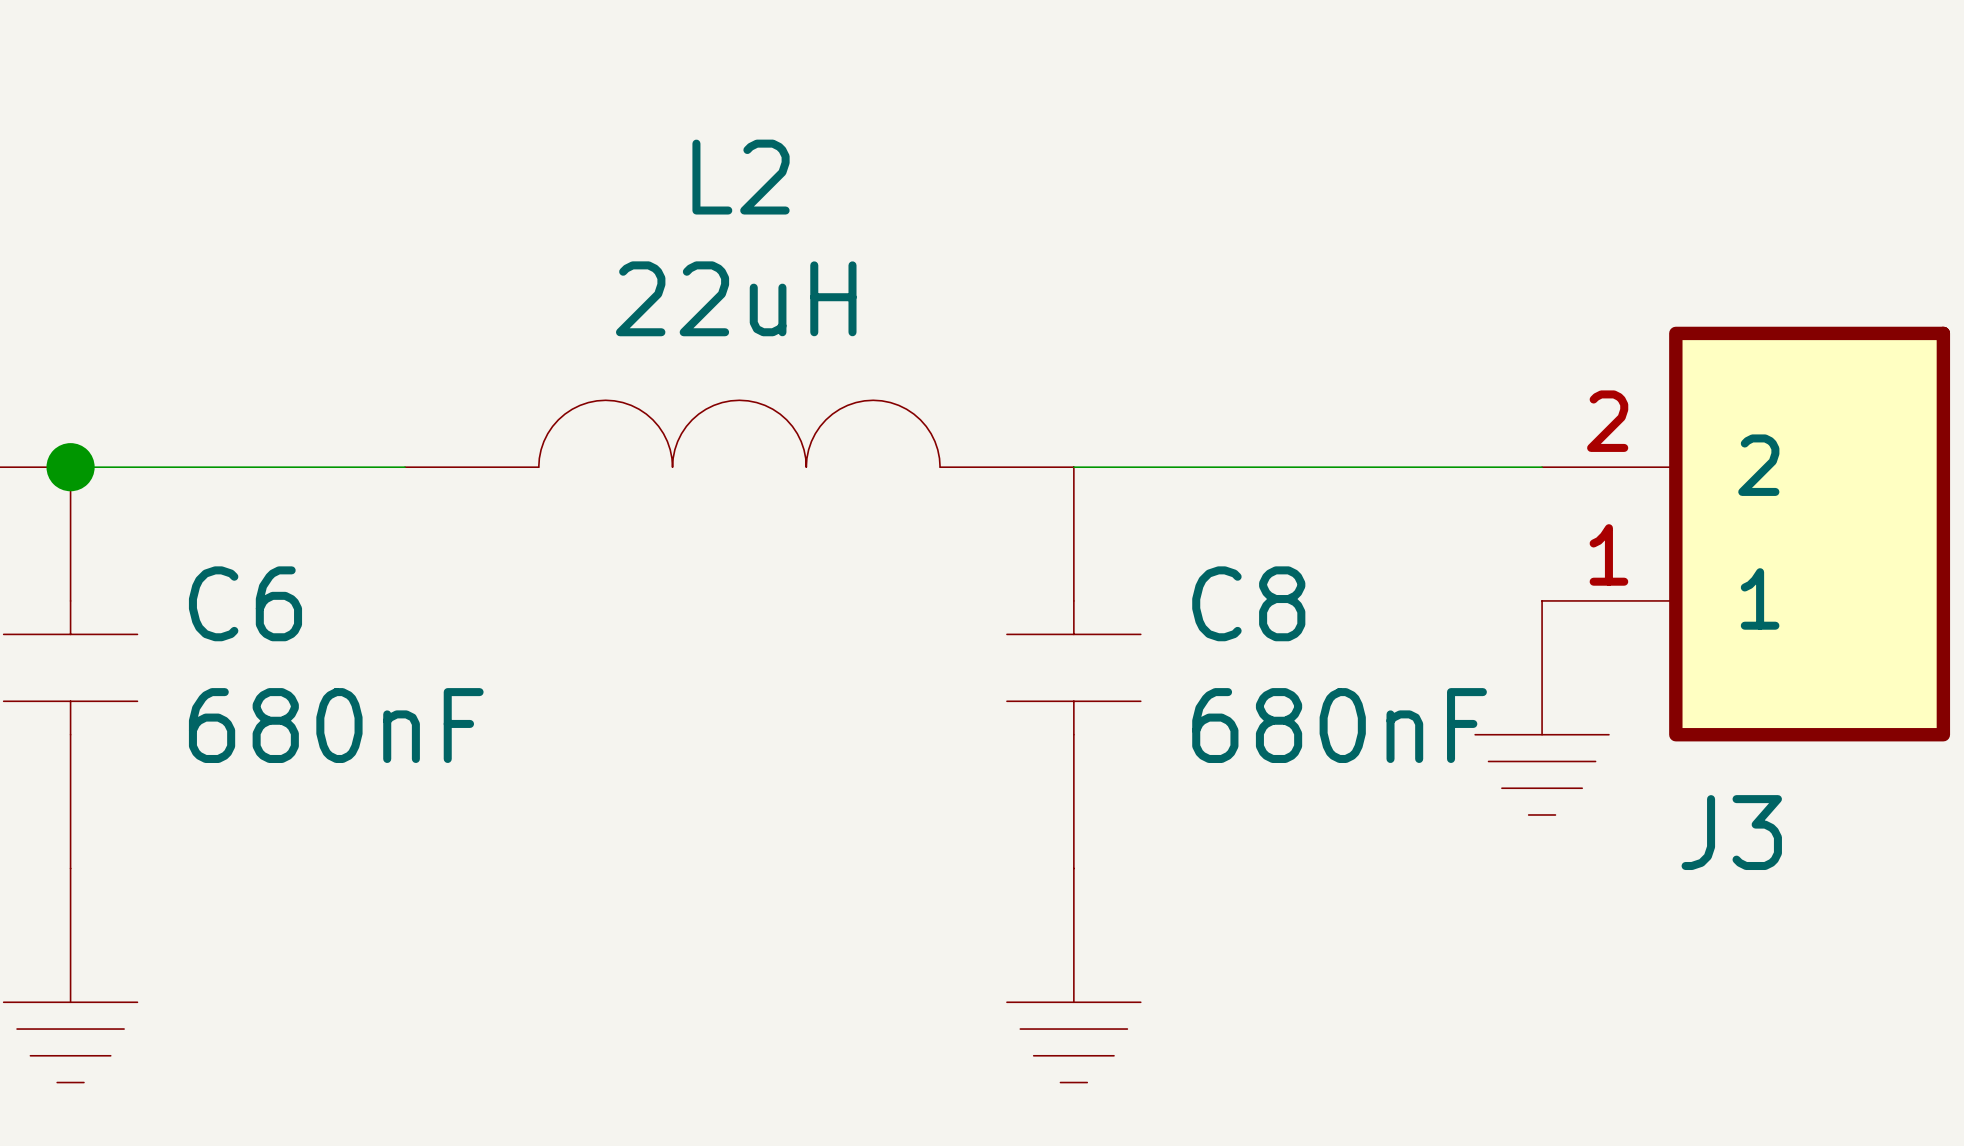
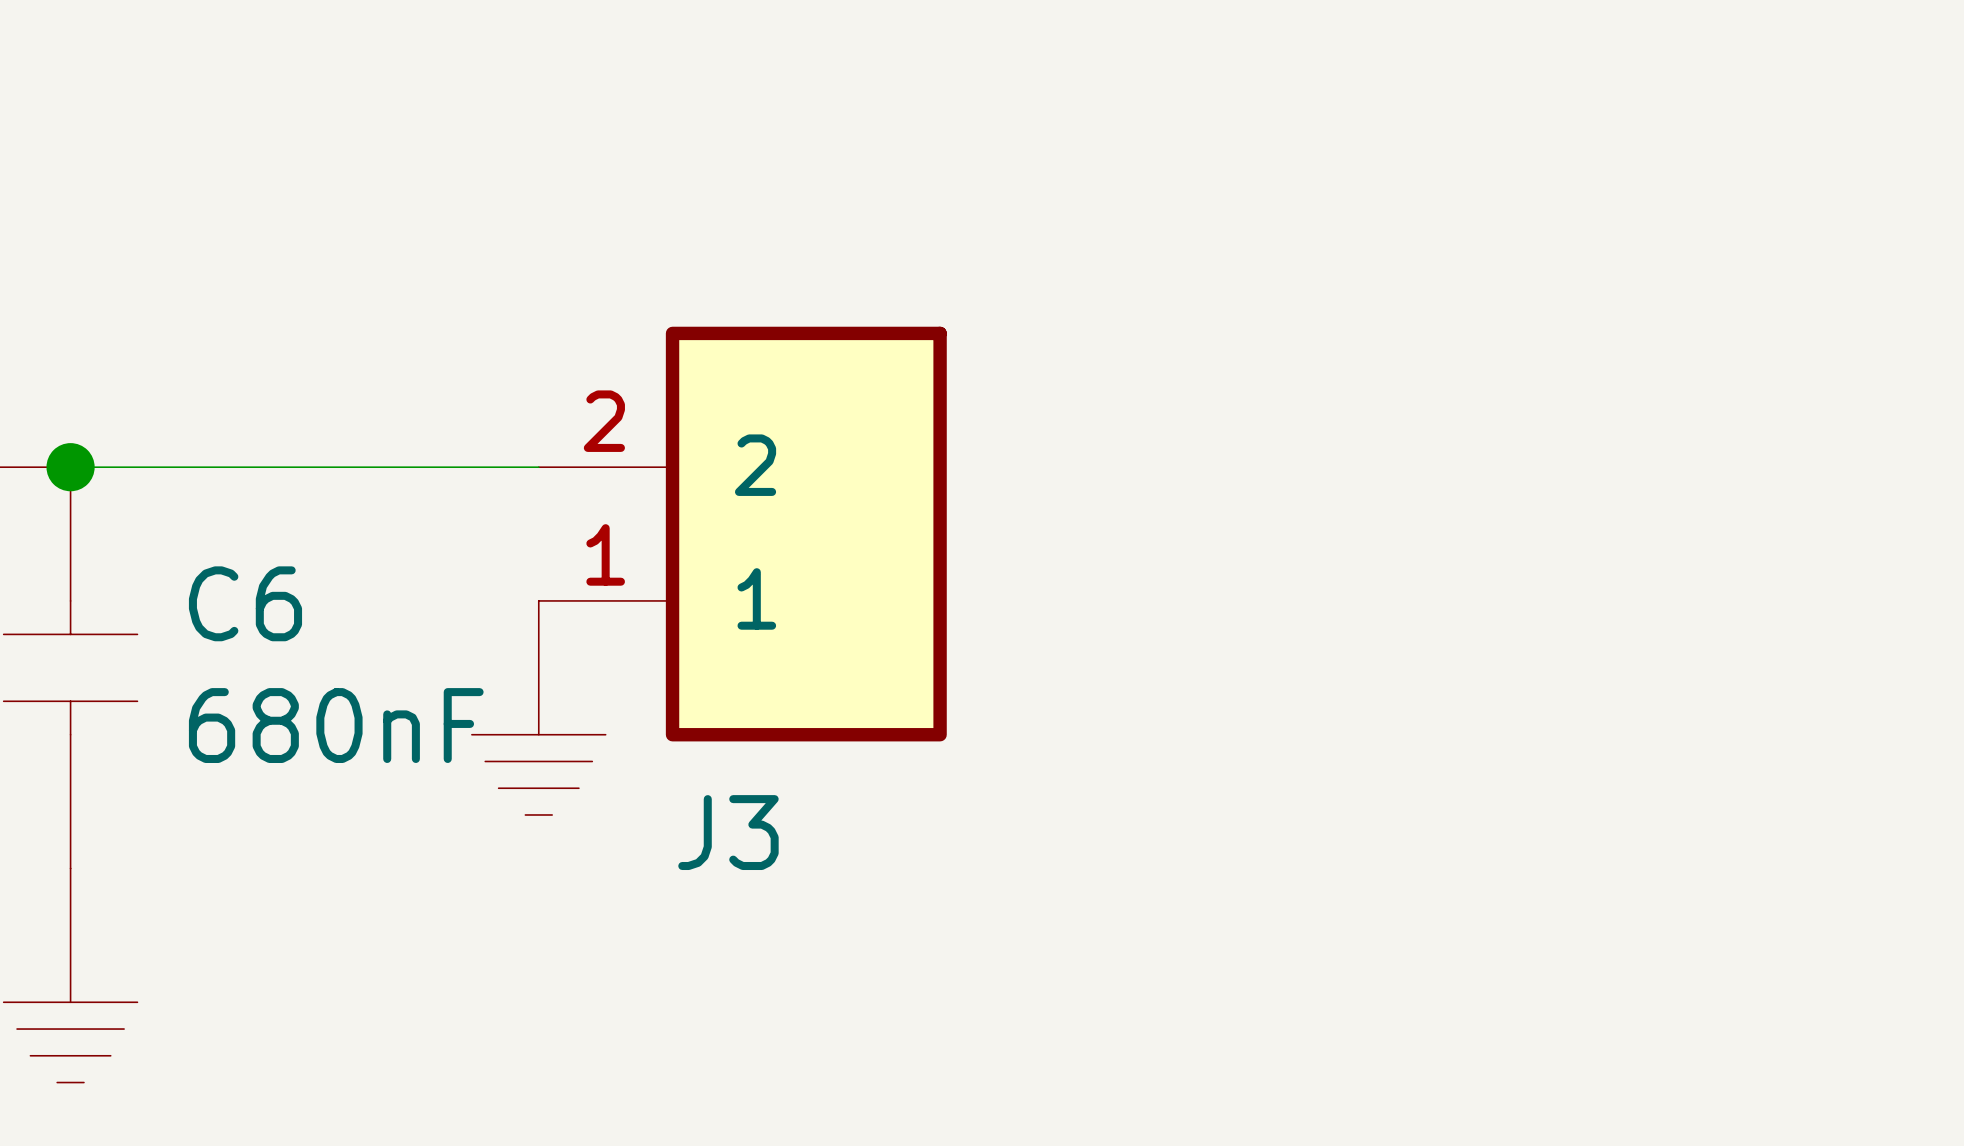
L2: (739, 433) -> none
wire: (1073, 467) (1542, 467) -> none
J3 position: (1746, 534) -> (742, 534)
C8: (1073, 667) -> none
power symbol: none -> (538, 707)
power symbol: (1542, 707) -> none
power symbol: (1073, 975) -> none

